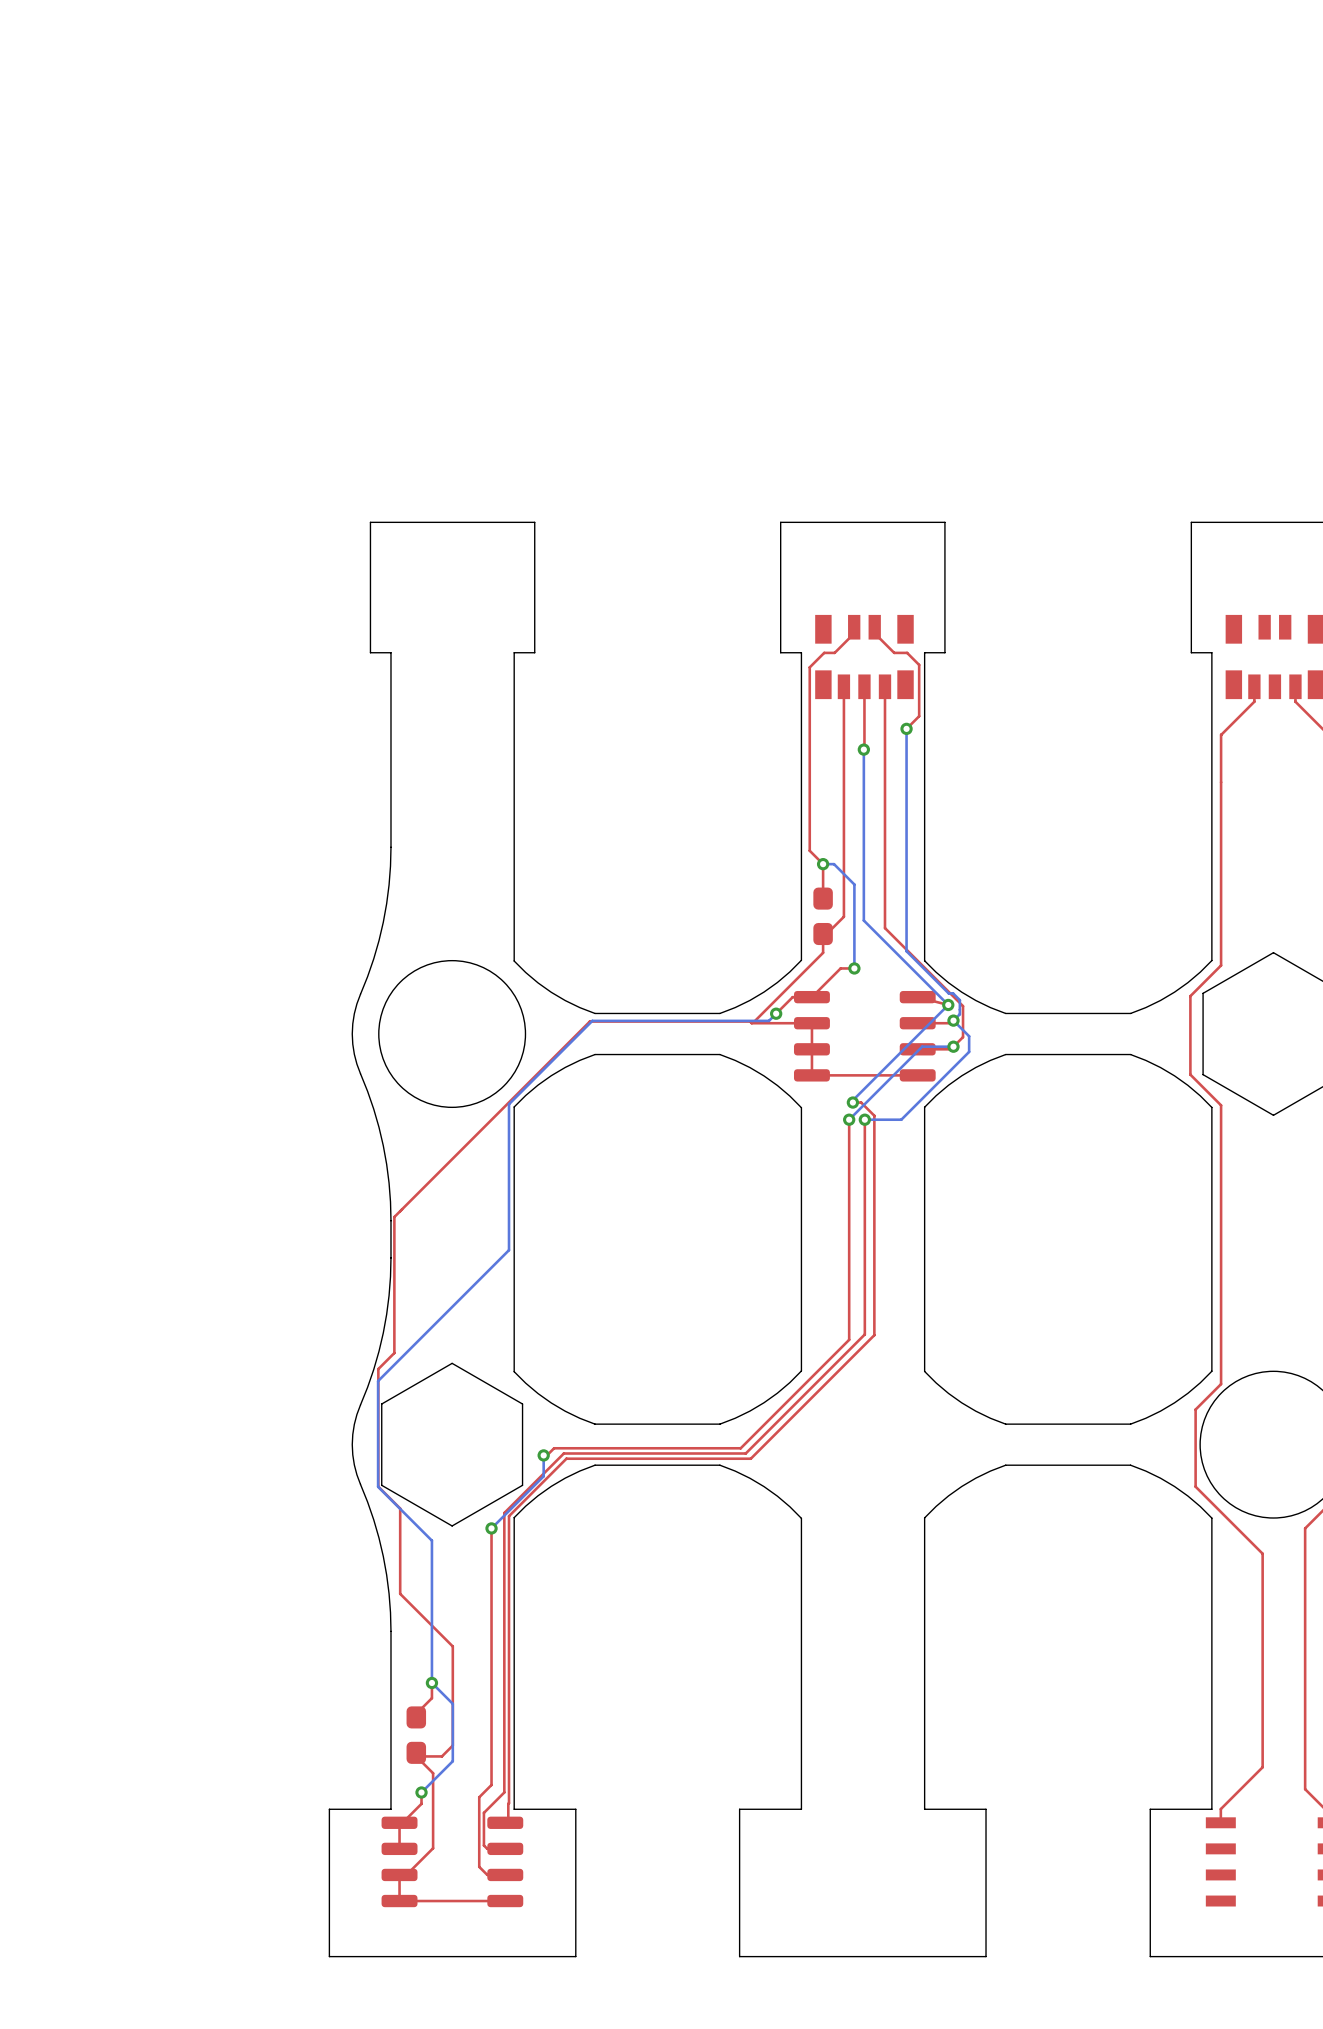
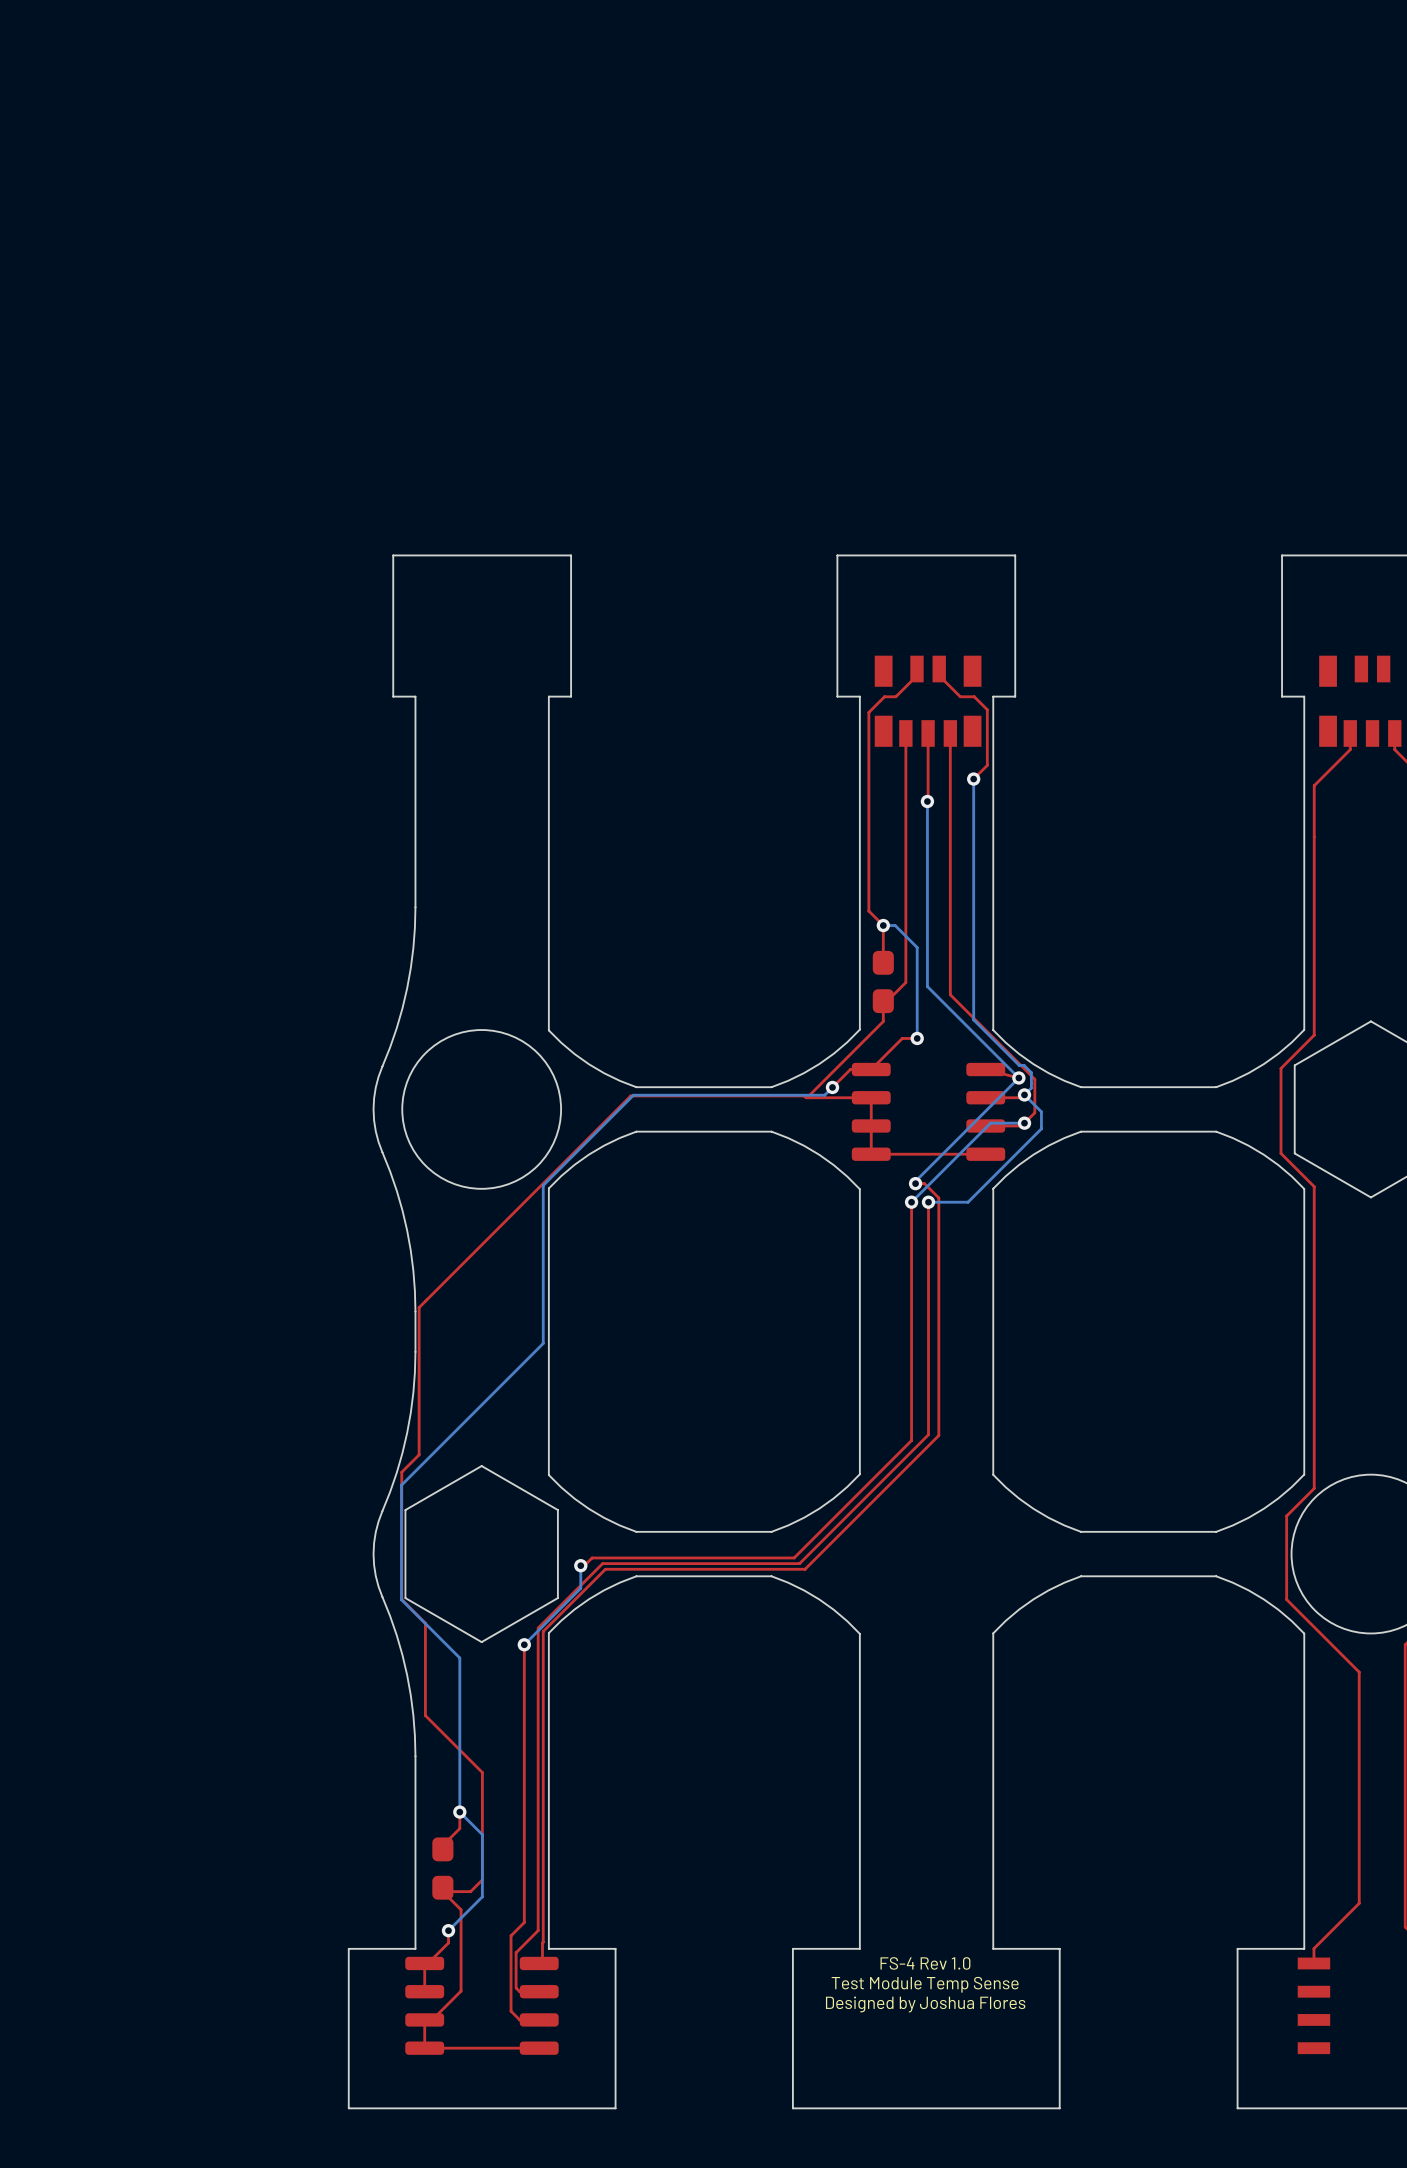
text: none -> FS-4 Rev 1.0 (925, 1963)
text: none -> Test Module Temp Sense (925, 1984)
text: none -> Designed by Joshua Flores (925, 2004)

